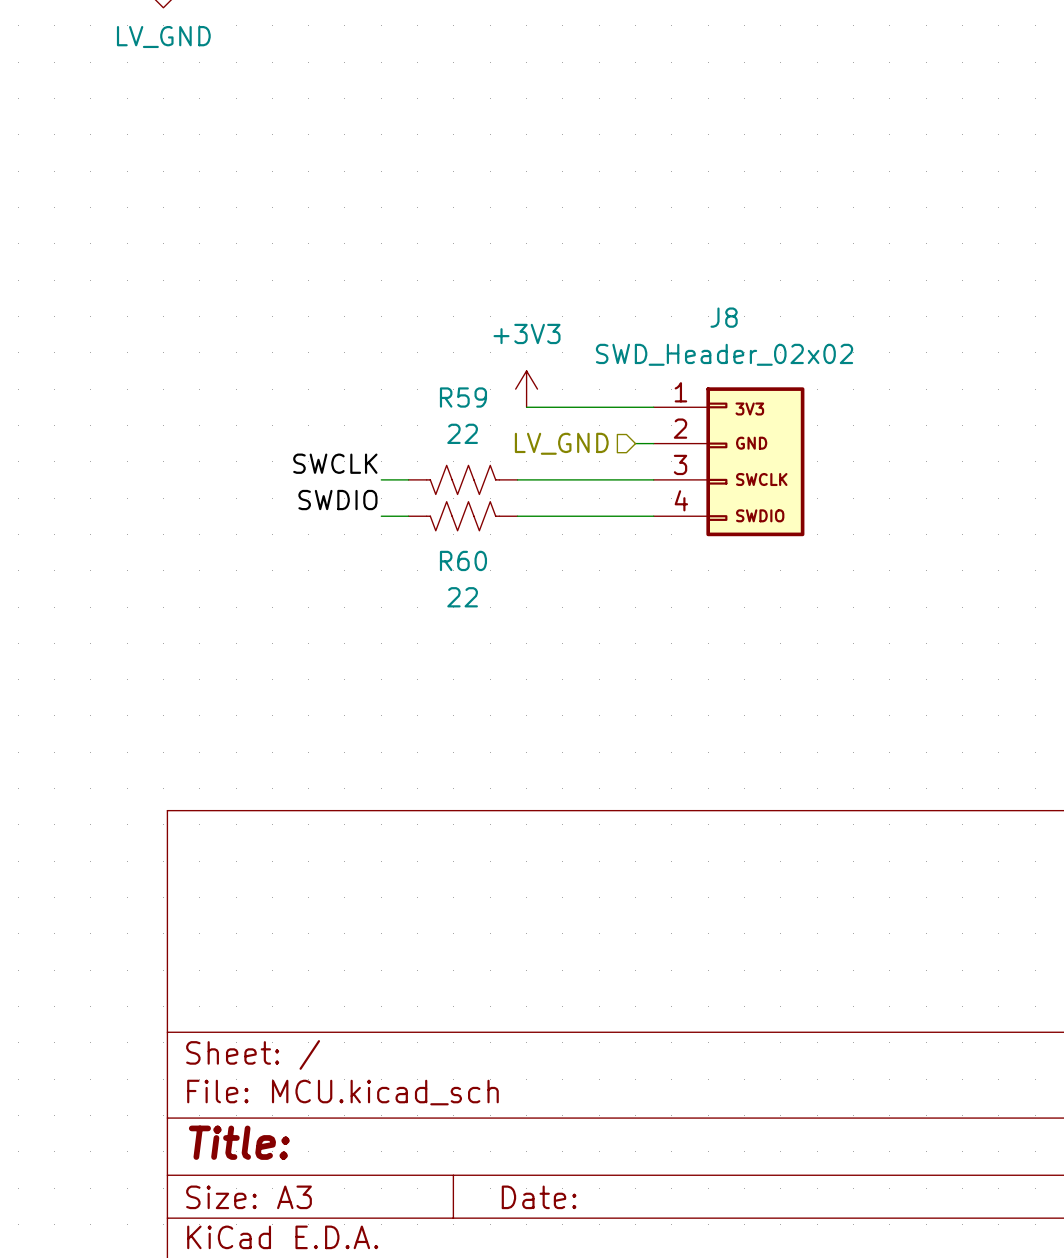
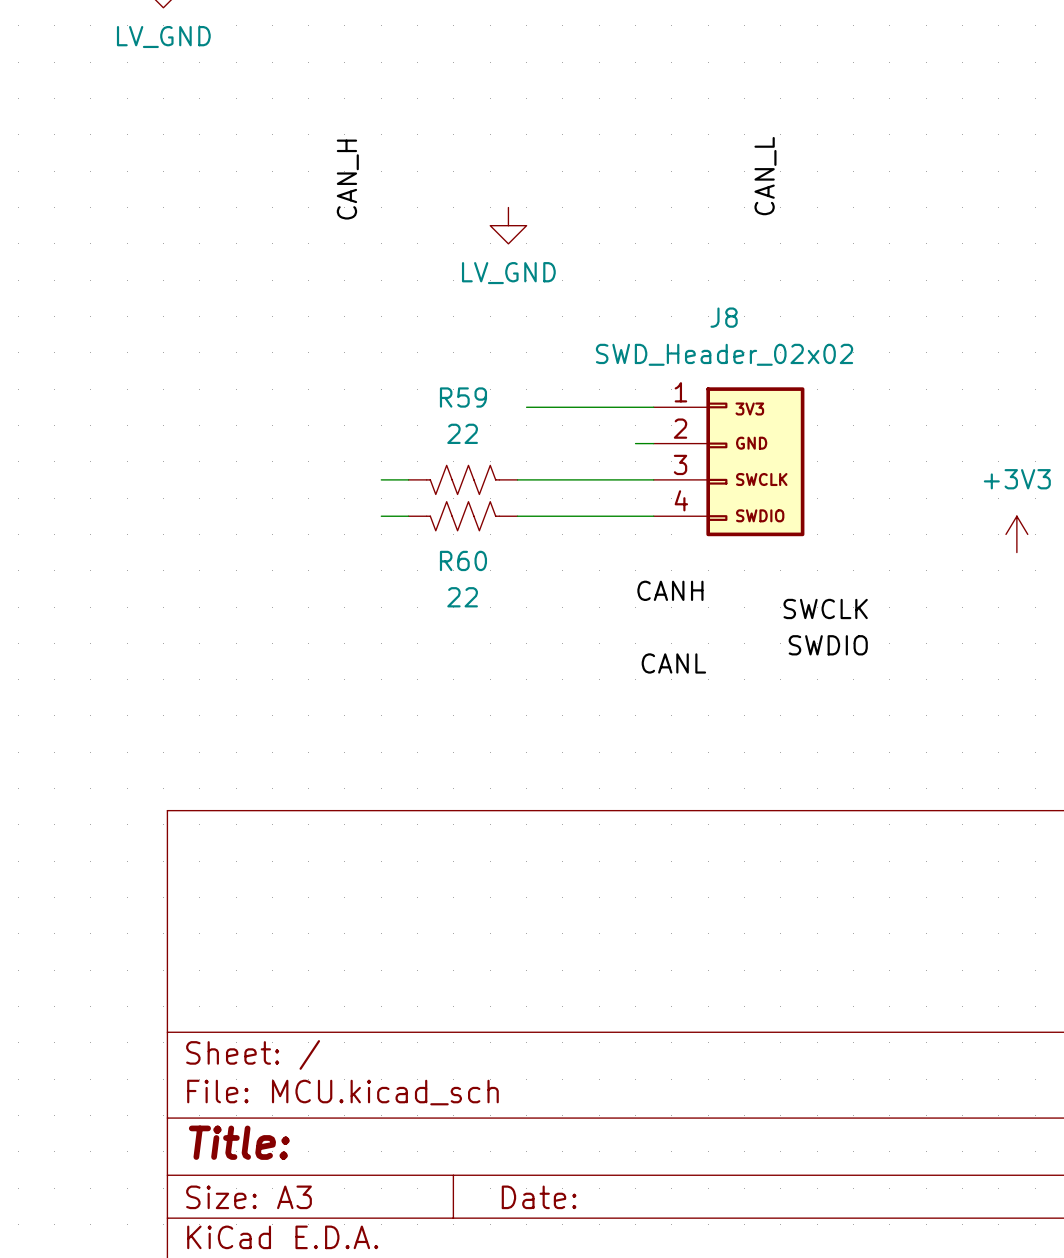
label: none -> CAN_L (765, 176)
label: none -> CAN_H (347, 179)
power symbol: none -> LV_GND (508, 225)
power symbol: +3V3 (526, 389) -> none
hierarchical label: LV_GND (561, 443) -> none
label: SWCLK (335, 463) -> none
label: SWDIO (337, 500) -> none
power symbol: none -> +3V3 (1016, 534)
label: none -> CANH (670, 590)
label: none -> SWCLK (825, 608)
label: none -> SWDIO (828, 645)
label: none -> CANL (673, 663)

